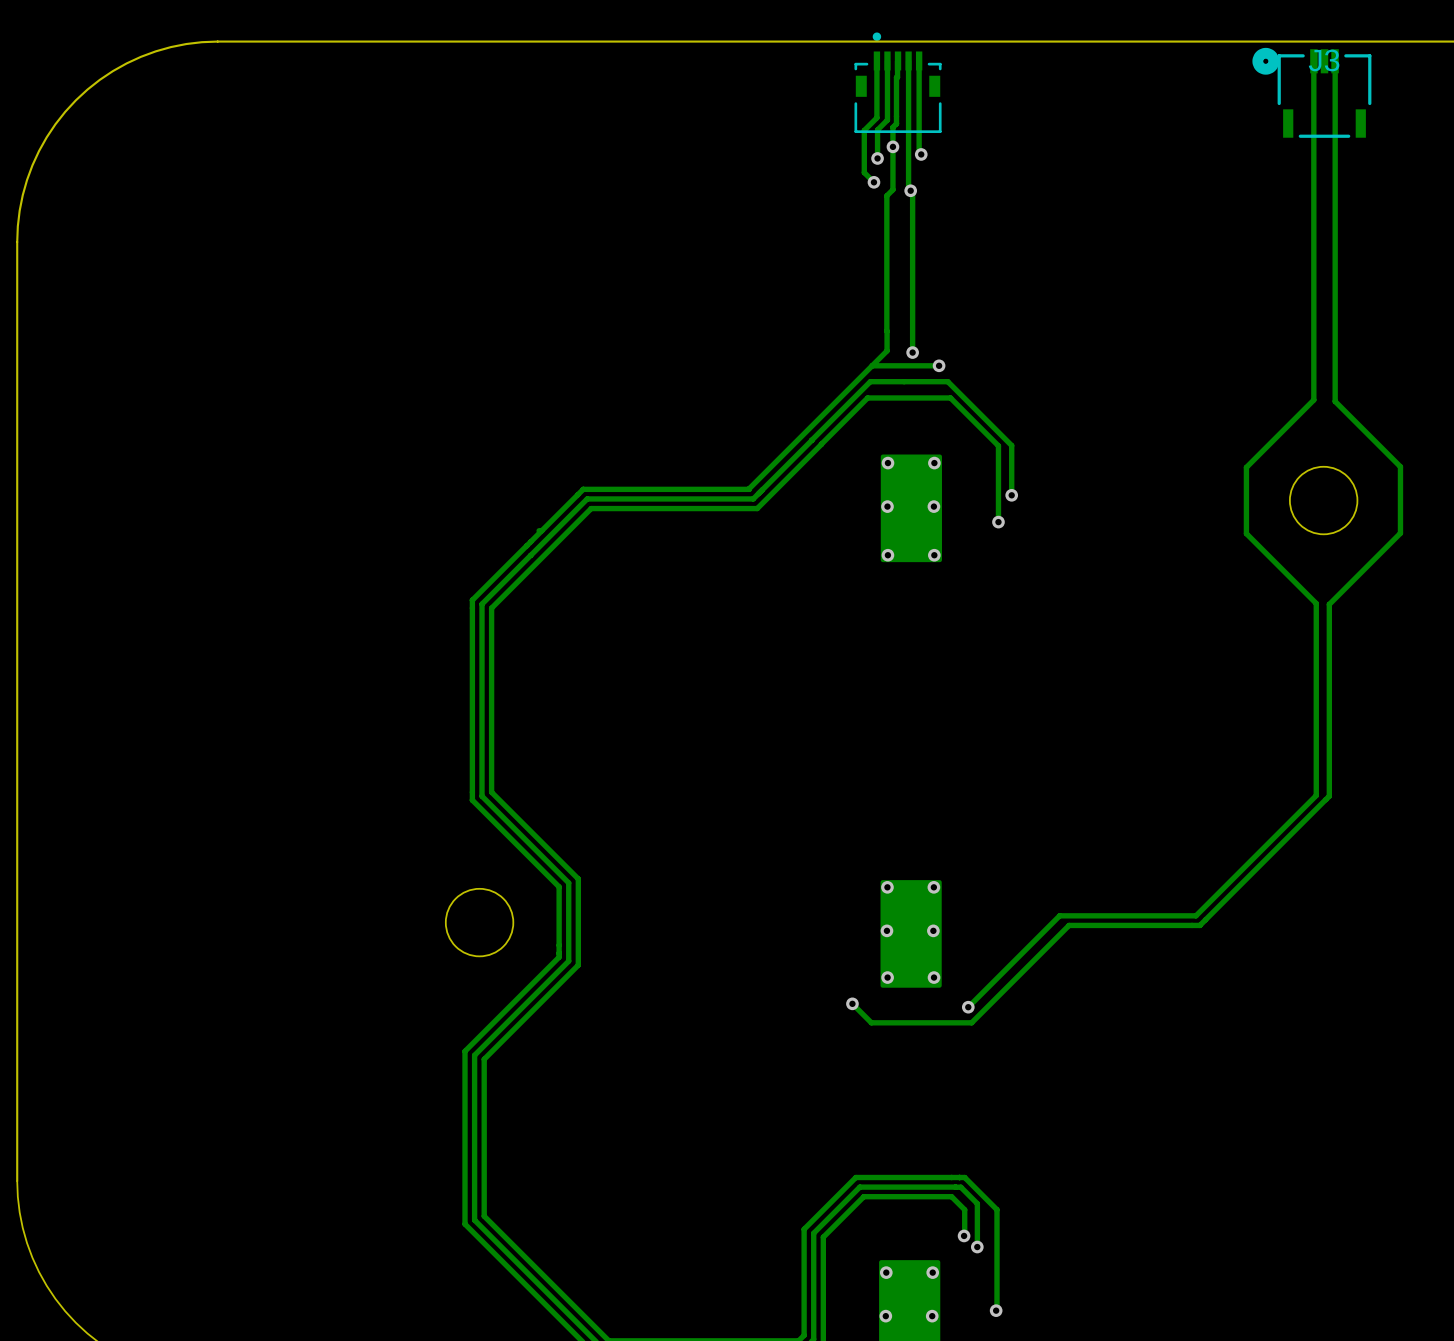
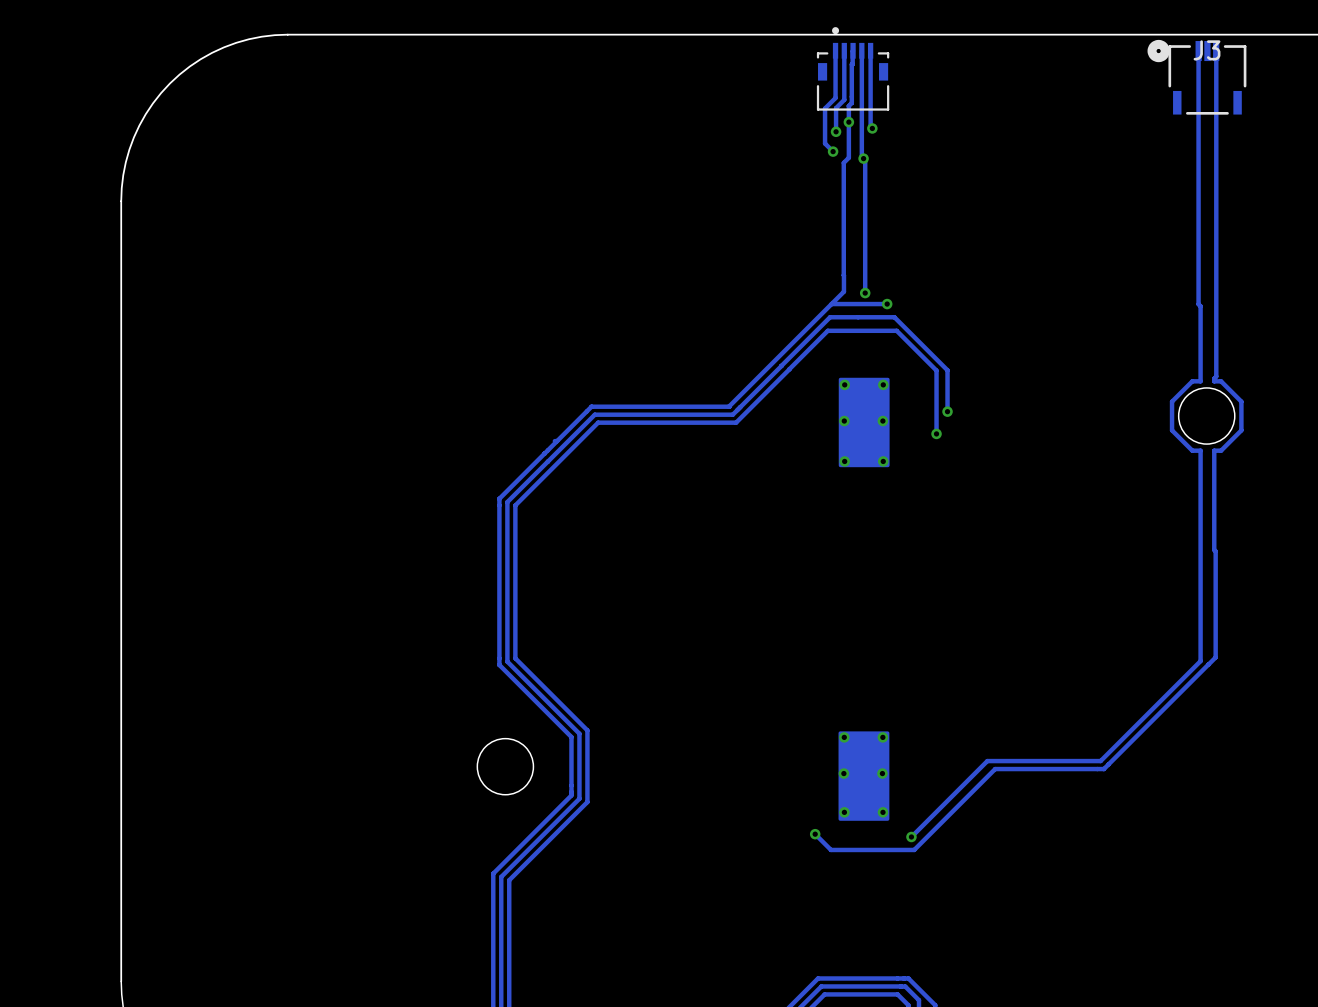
track: (1313, 366) (1313, 400) (1246, 467) (1246, 533) (1316, 603) -> (1198, 304) (1200, 306) (1200, 381) (1192, 381) (1172, 401) (1172, 430) (1192, 450) (1200, 450) (1200, 501)
track: (1335, 401) (1400, 466) (1400, 533) (1329, 604) (1329, 796) -> (1216, 333) (1216, 376) (1214, 381) (1221, 381) (1241, 401) (1241, 430) (1221, 450) (1214, 450) (1215, 657) (1211, 661)

